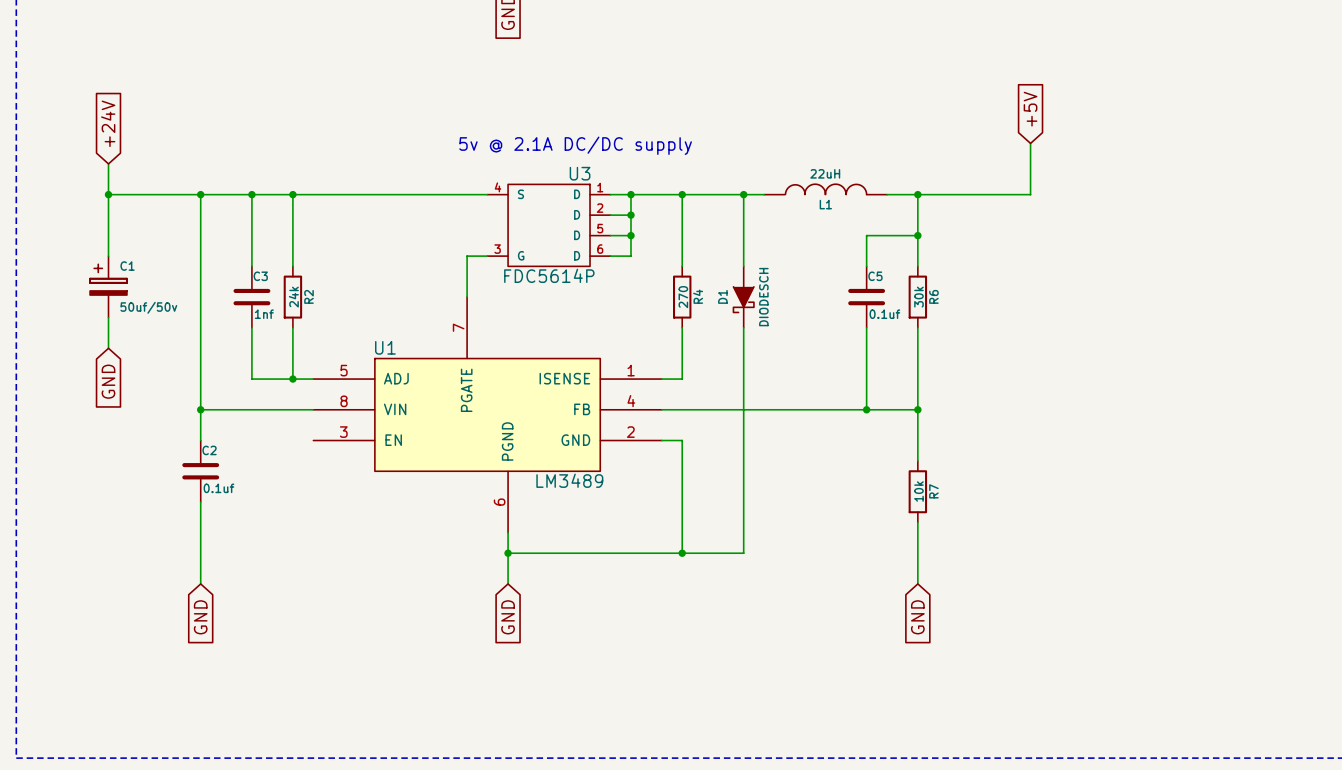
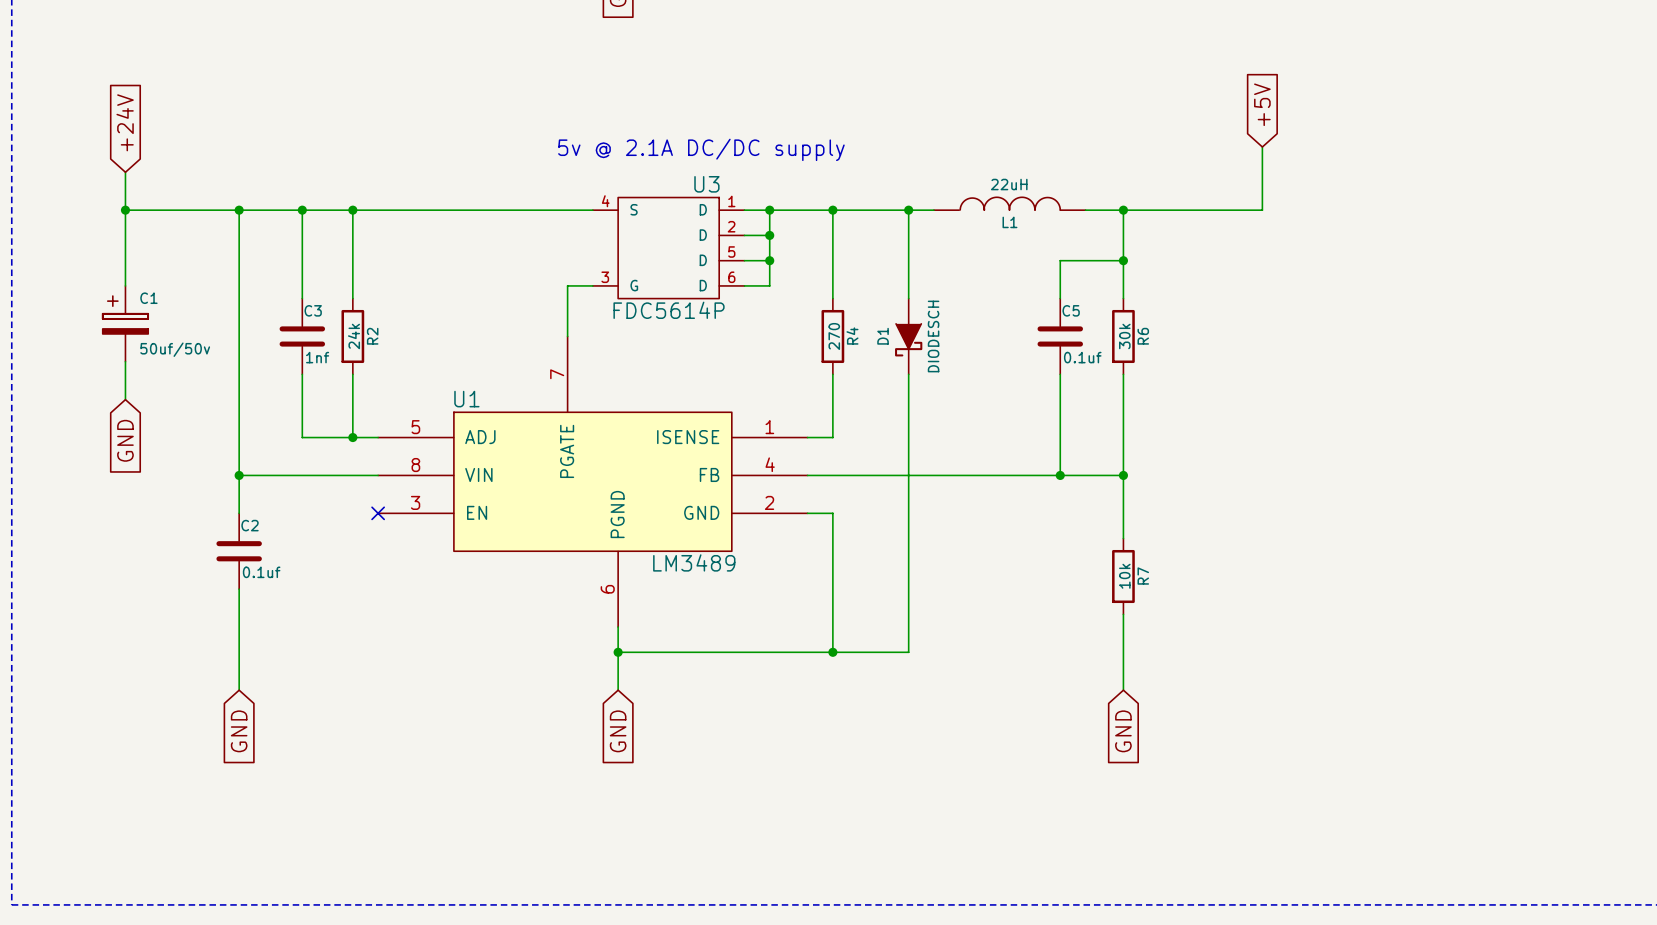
no-connect mark: none -> (378, 513)

